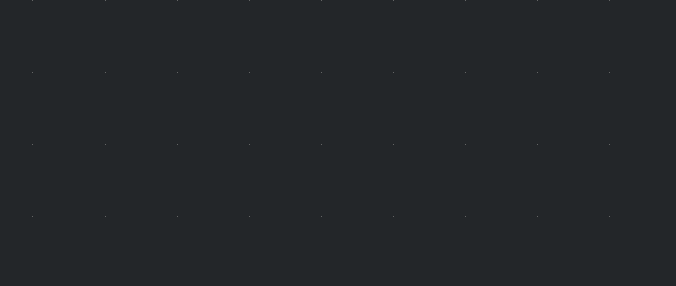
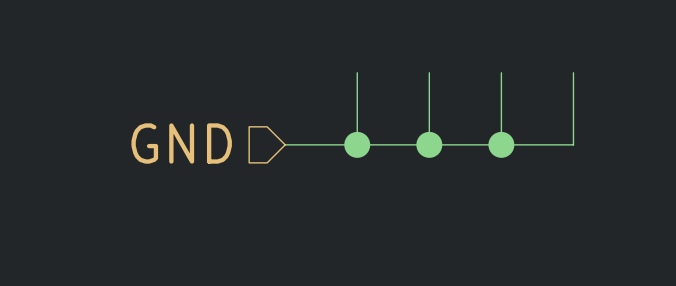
wire: none -> (357, 72) (357, 144)
wire: none -> (429, 72) (429, 144)
wire: none -> (501, 72) (501, 144)
wire: none -> (573, 72) (573, 144) (285, 144)
hierarchical label: none -> GND (181, 143)
junction: none -> (357, 144)
junction: none -> (429, 144)
junction: none -> (501, 144)

